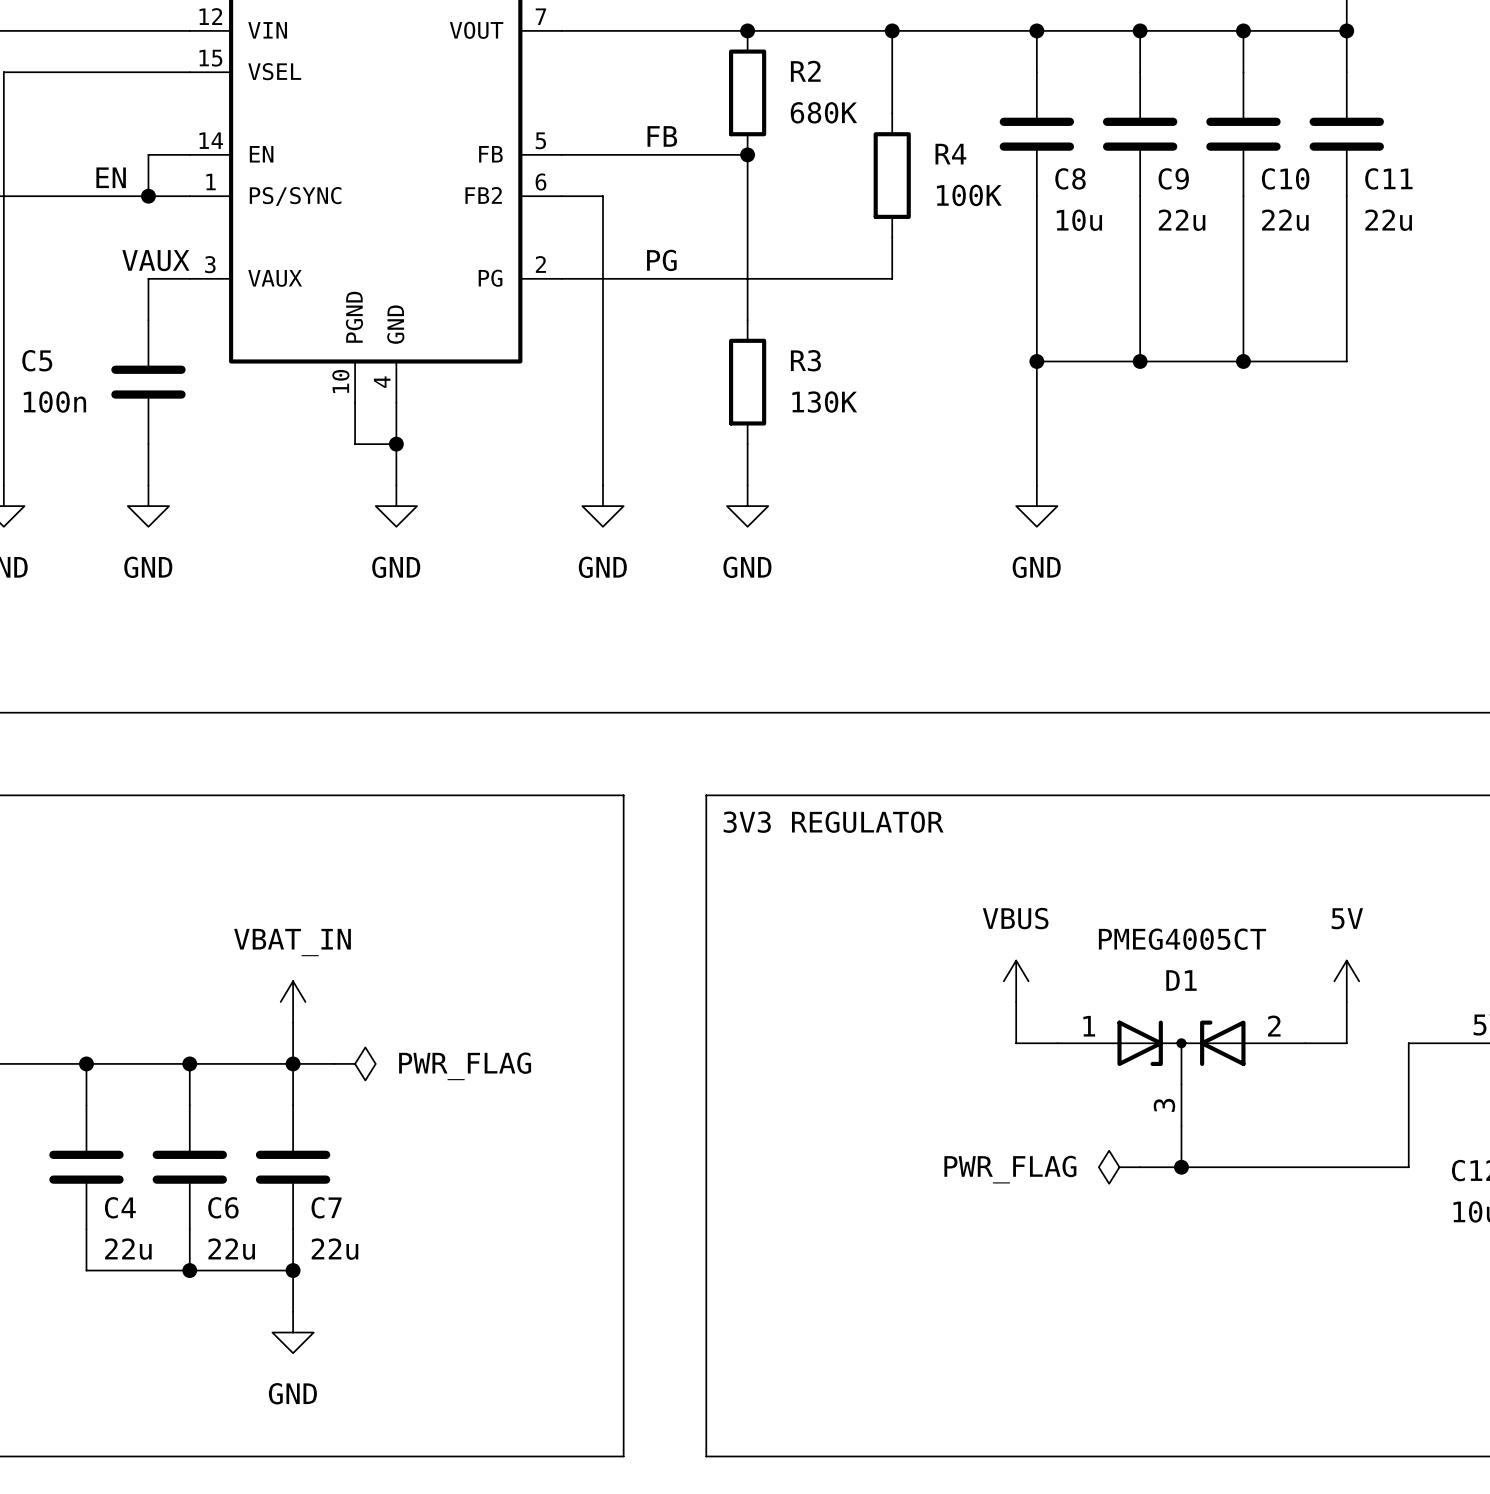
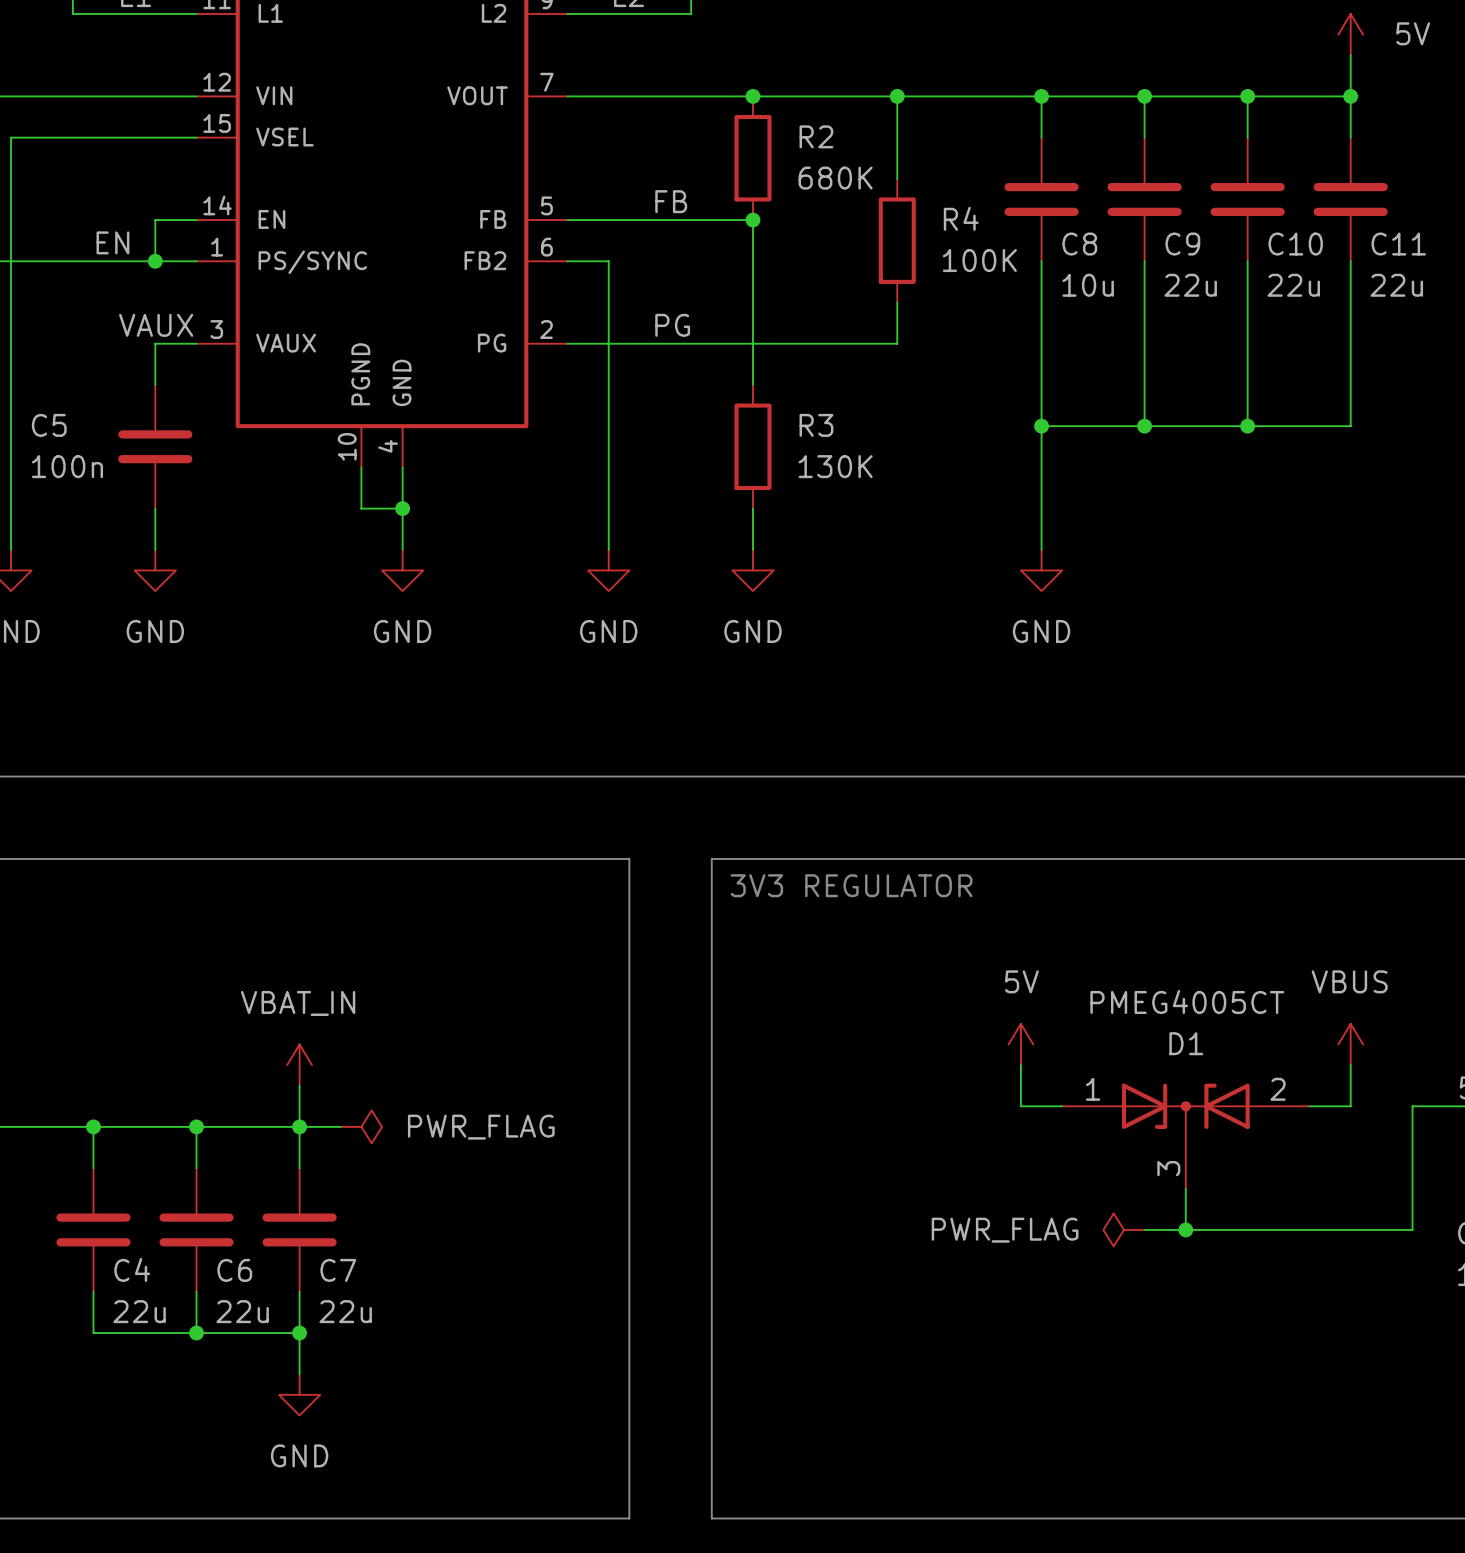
power symbol: VBUS (1016, 981) -> 5V (1020, 1044)
power symbol: 5V (1346, 981) -> VBUS (1350, 1044)

